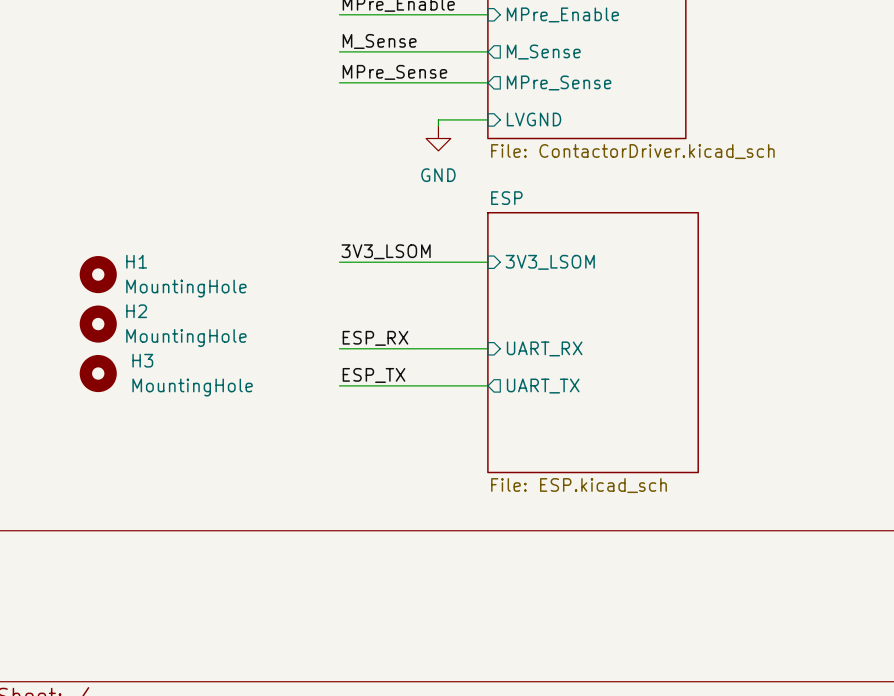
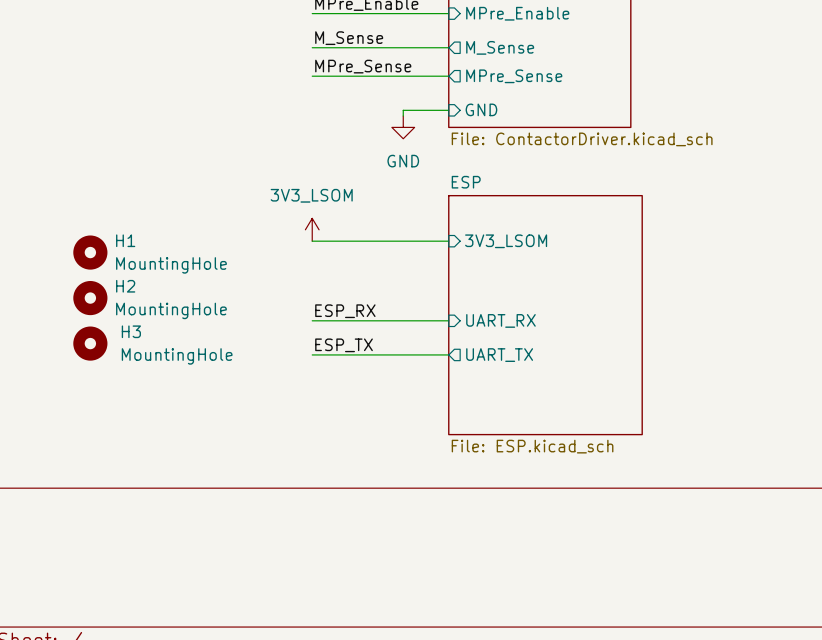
sheet pin: LVGND (534, 119) -> GND (481, 109)
power symbol: none -> 3V3_LSOM (312, 229)
label: 3V3_LSOM (386, 251) -> none

